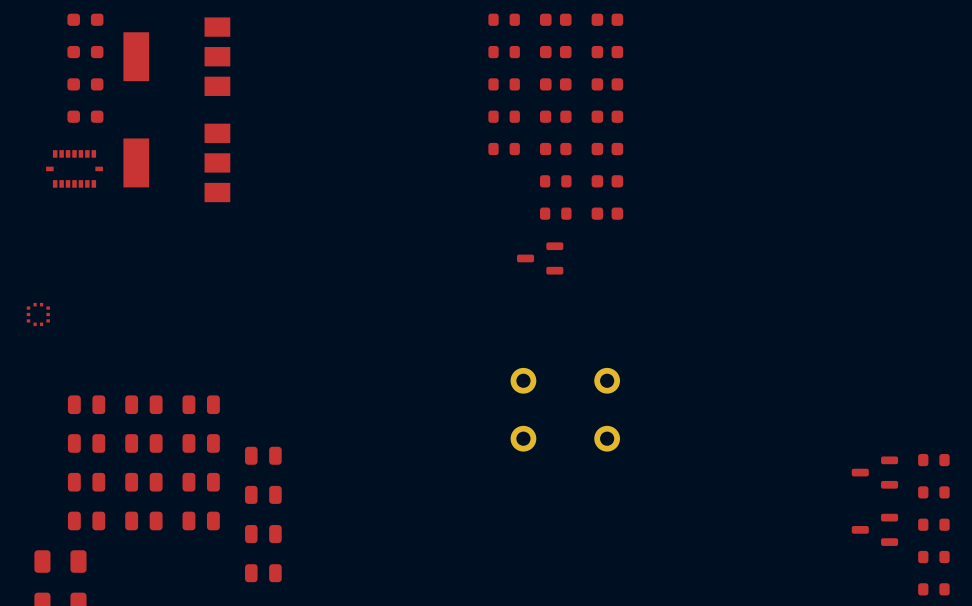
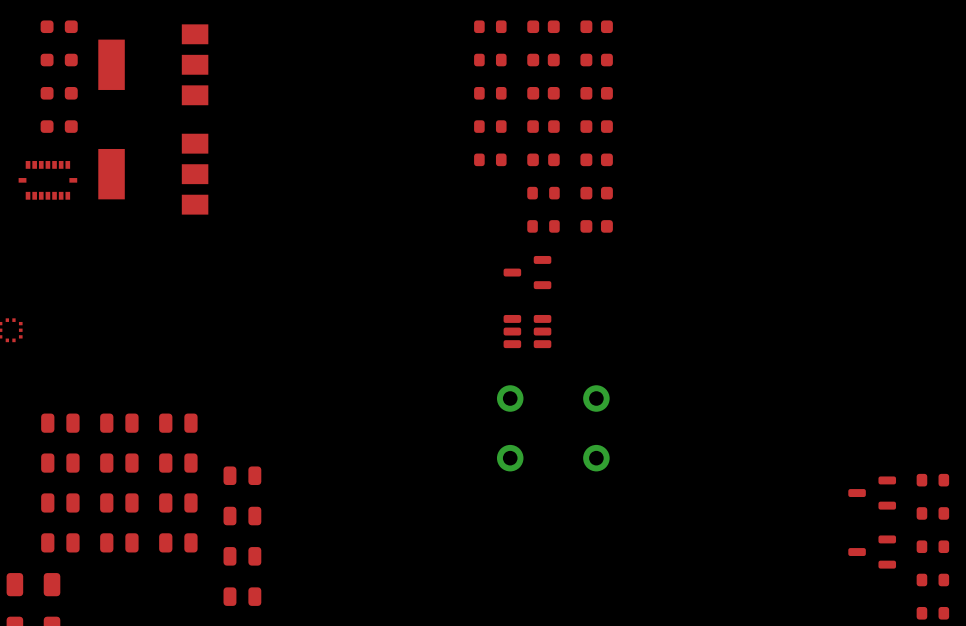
part: none -> (527, 331)

